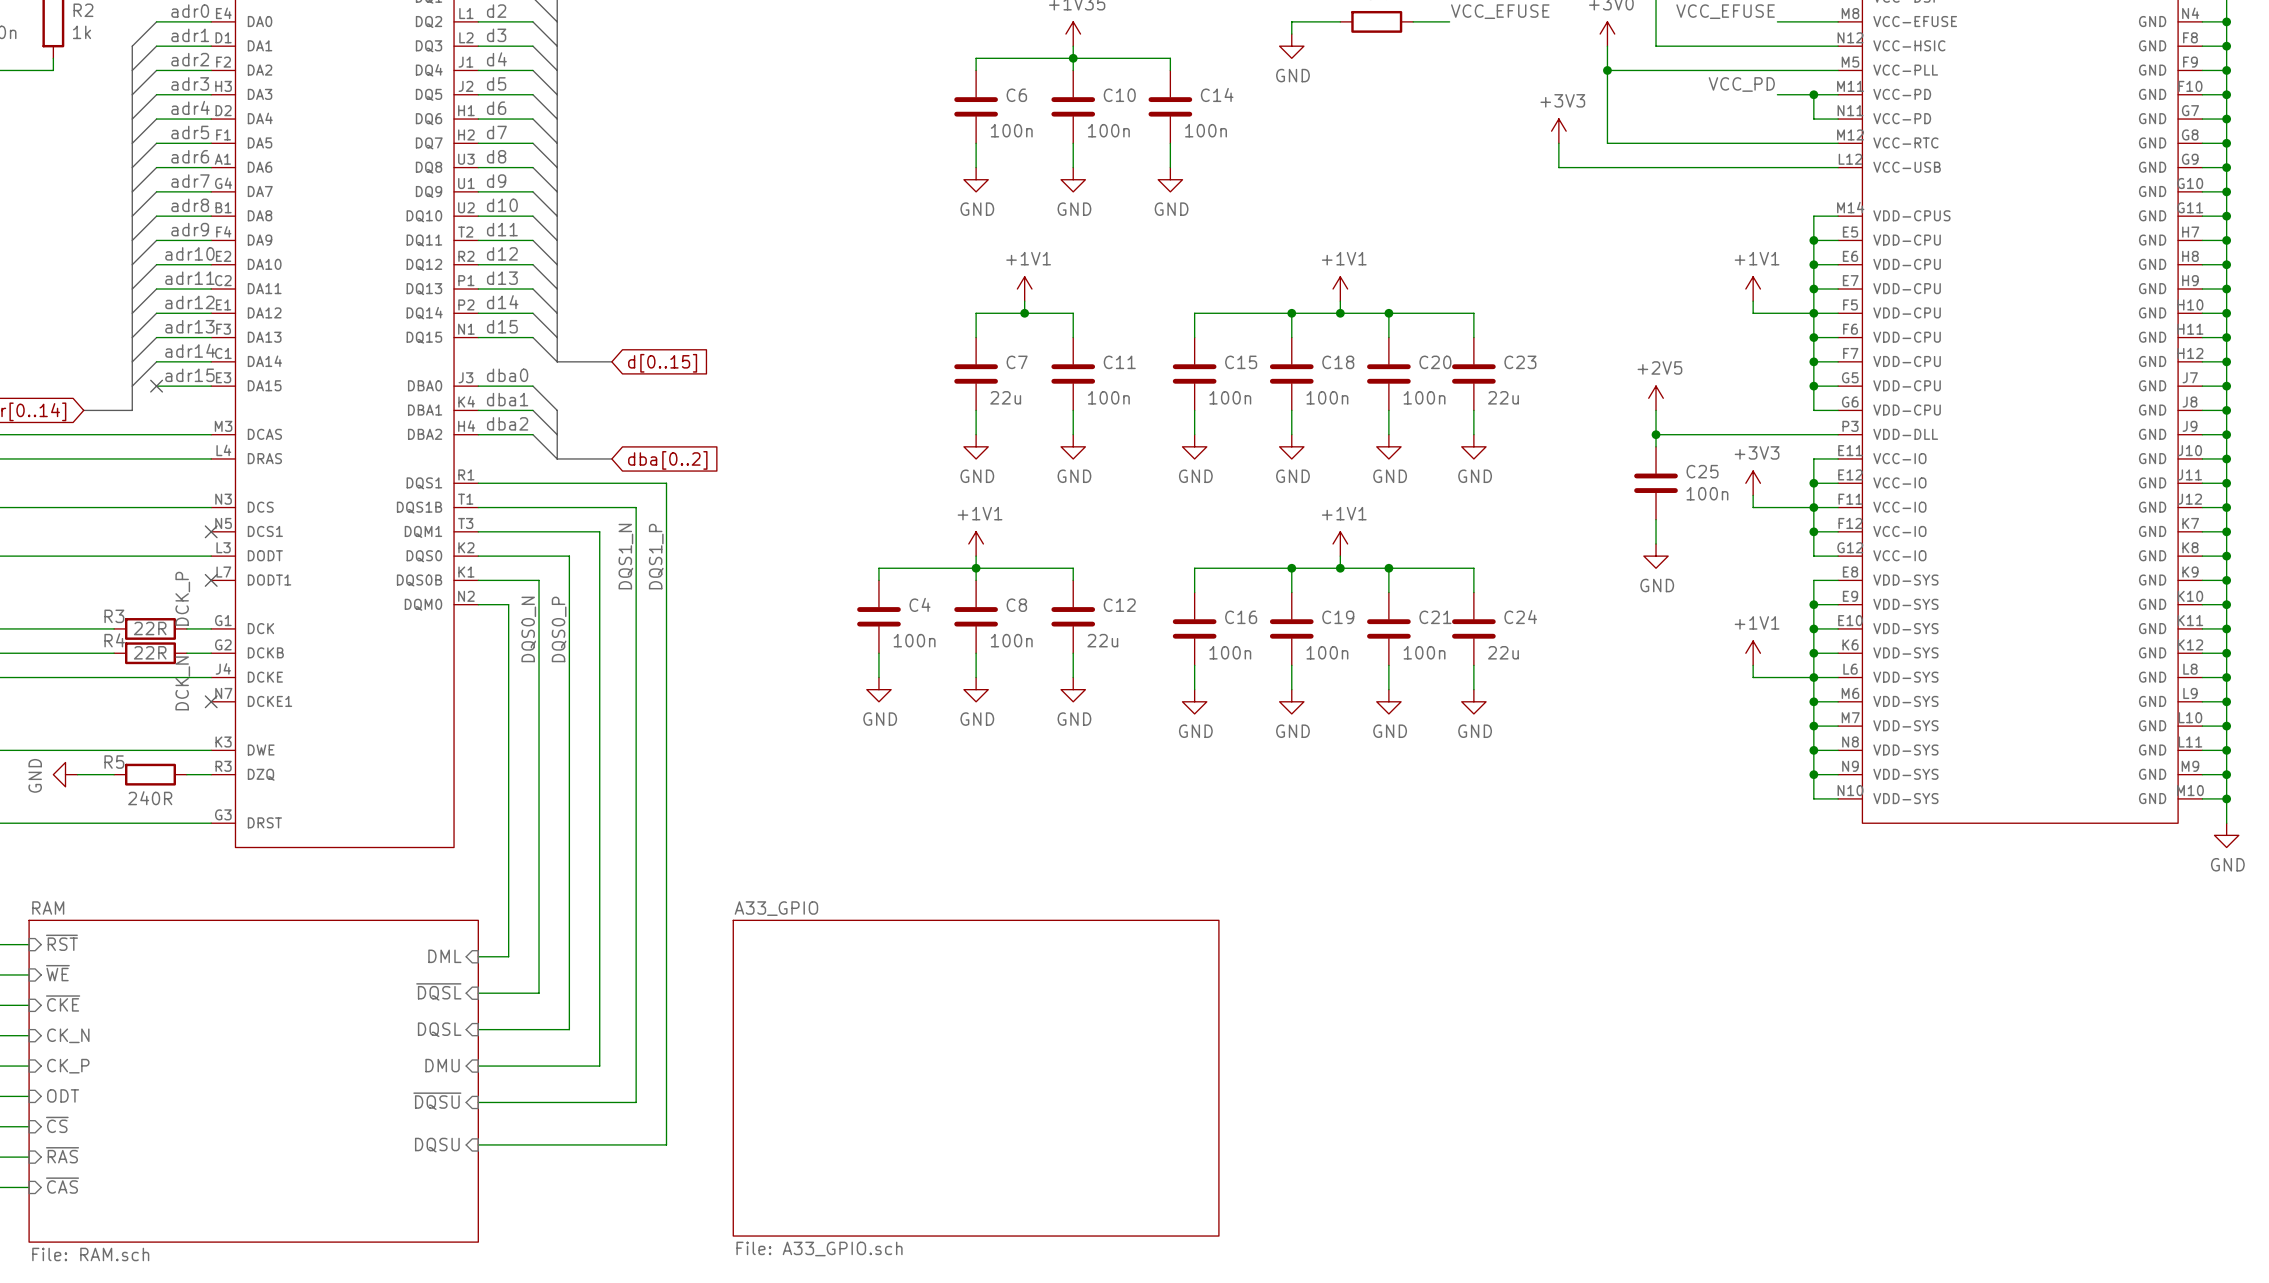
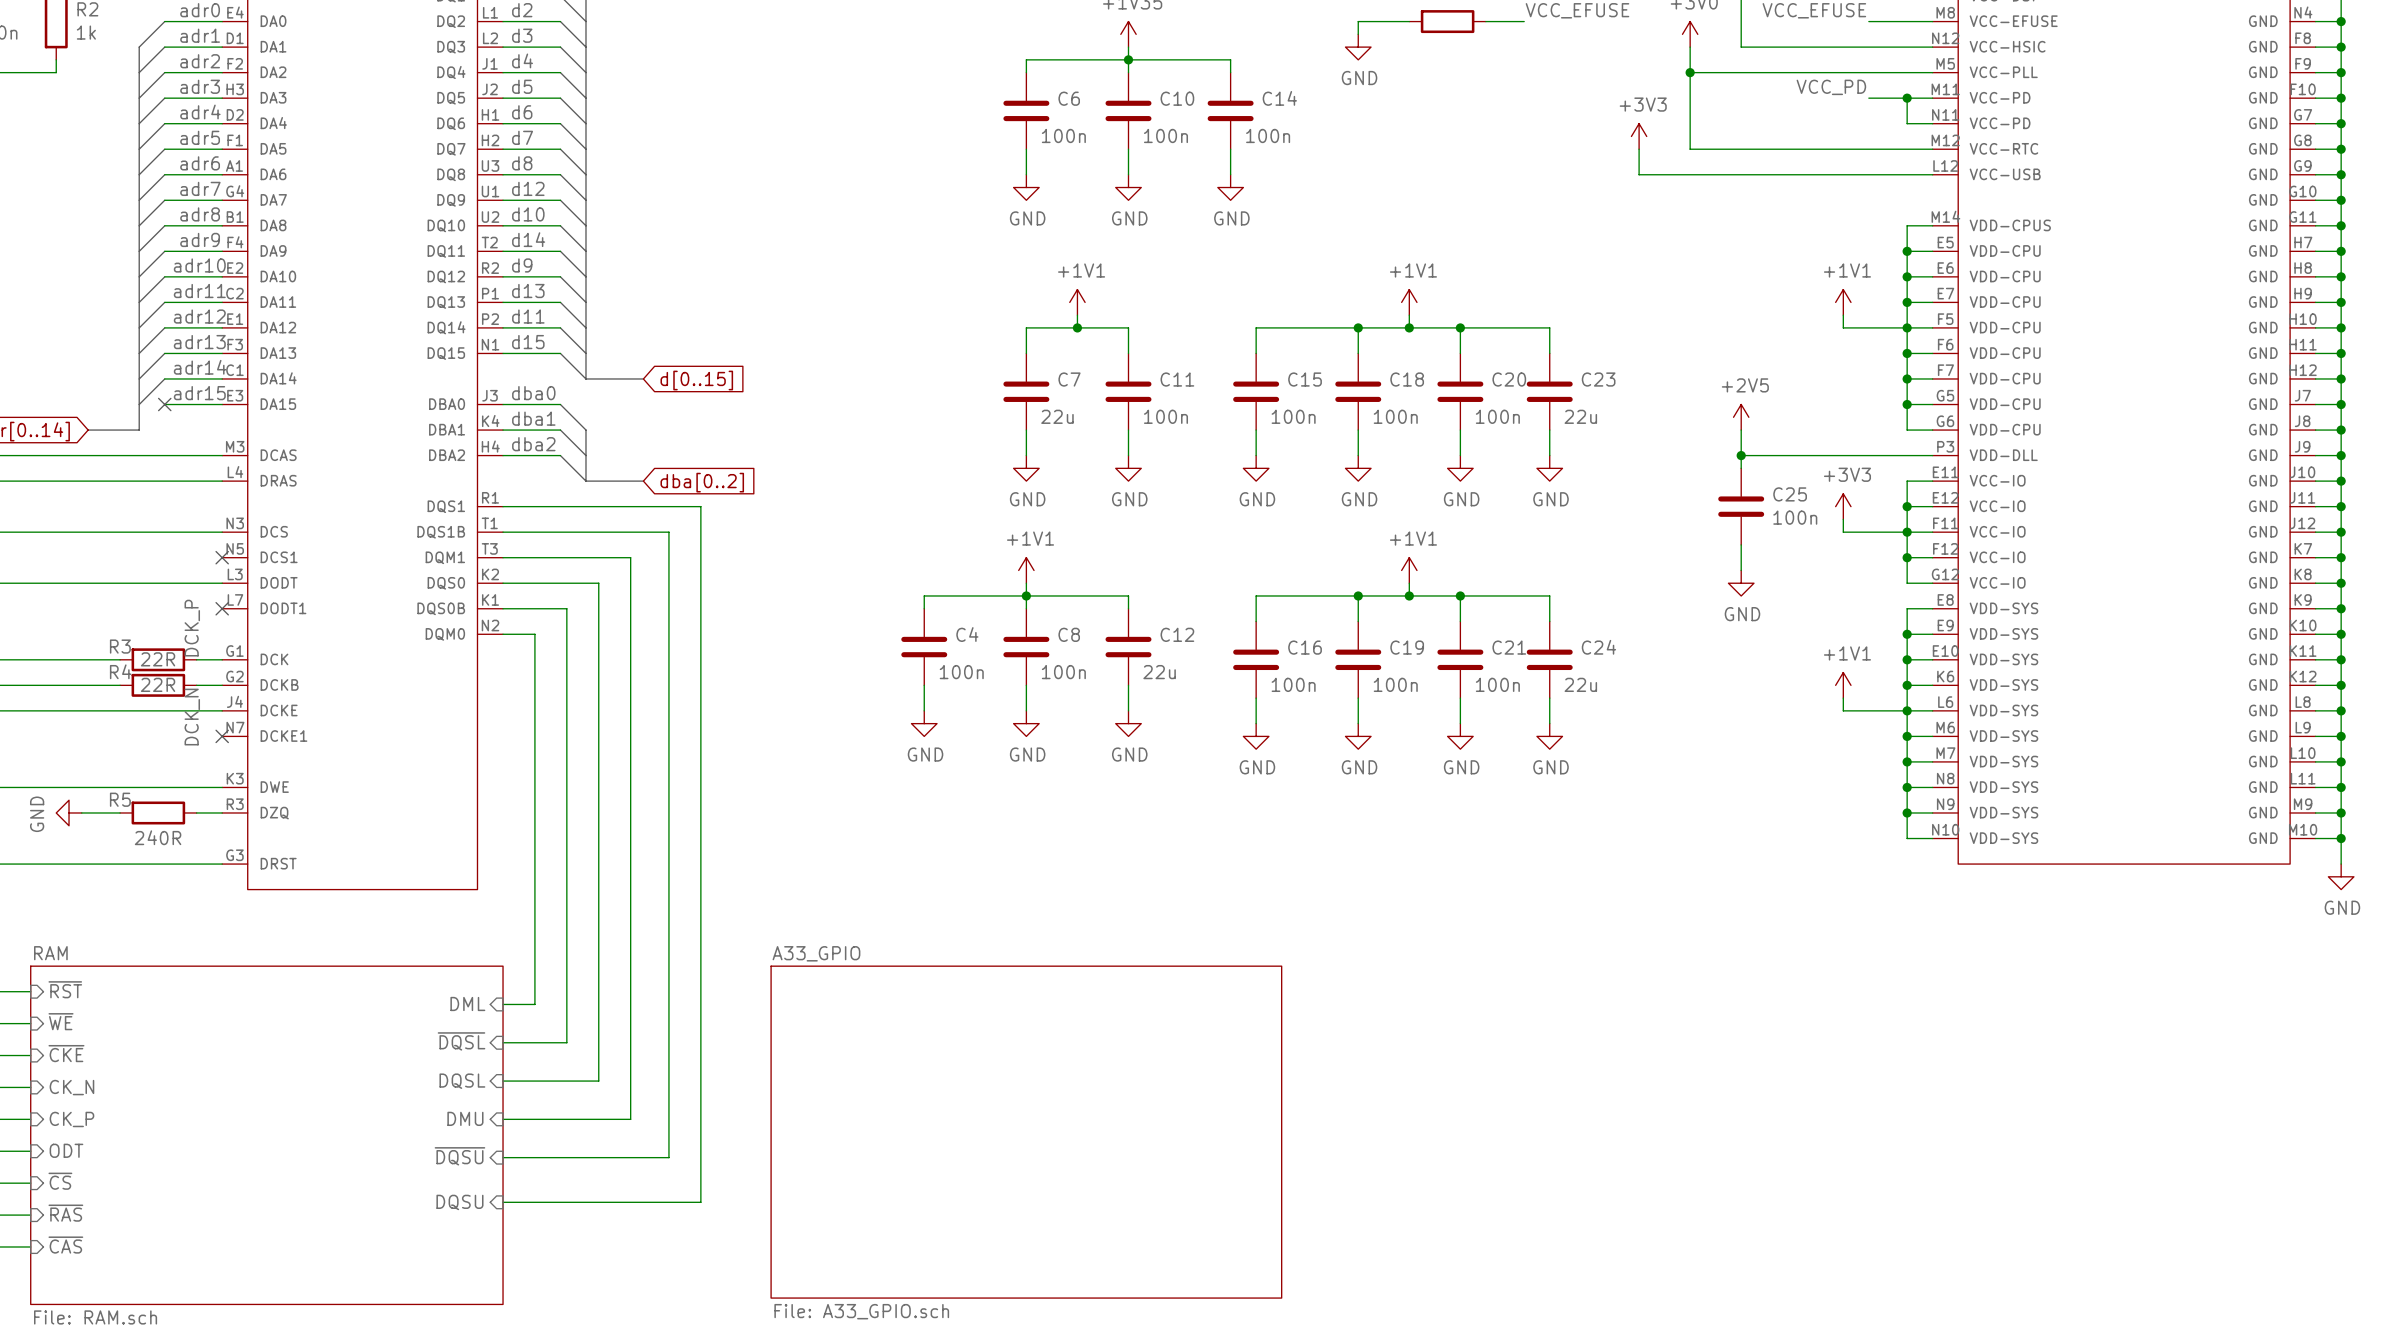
label: d9 (496, 181) -> d12 (528, 188)
label: d11 (502, 229) -> d14 (528, 239)
label: d12 (502, 253) -> d9 (522, 265)
label: d14 (502, 302) -> d11 (528, 316)
label: DQS1_N (625, 556) -> none
label: DQS1_P (656, 556) -> none
label: DQS0_N (528, 629) -> none
label: DQS0_P (559, 629) -> none

